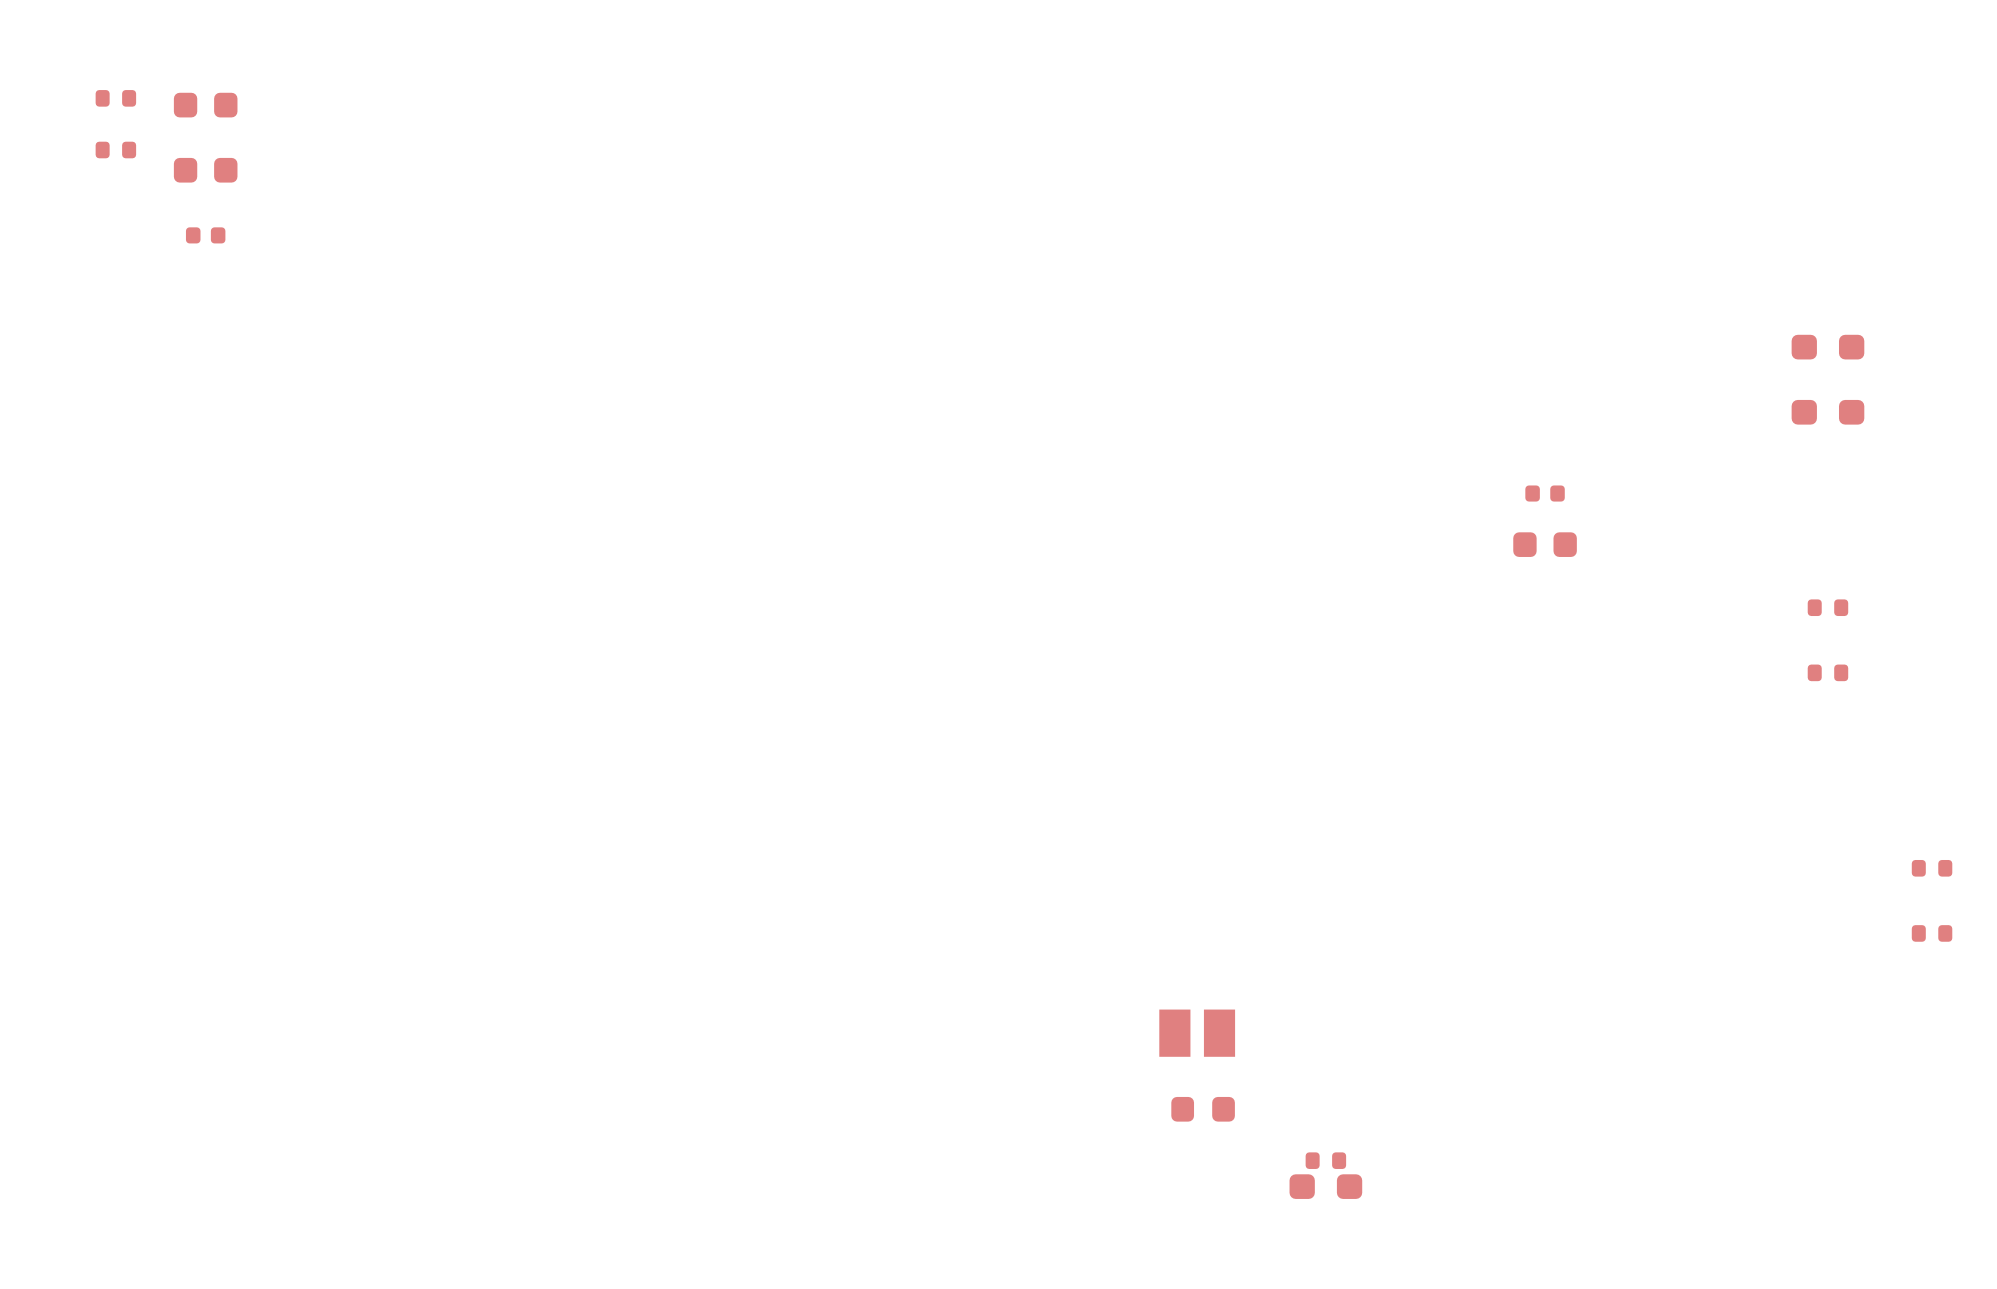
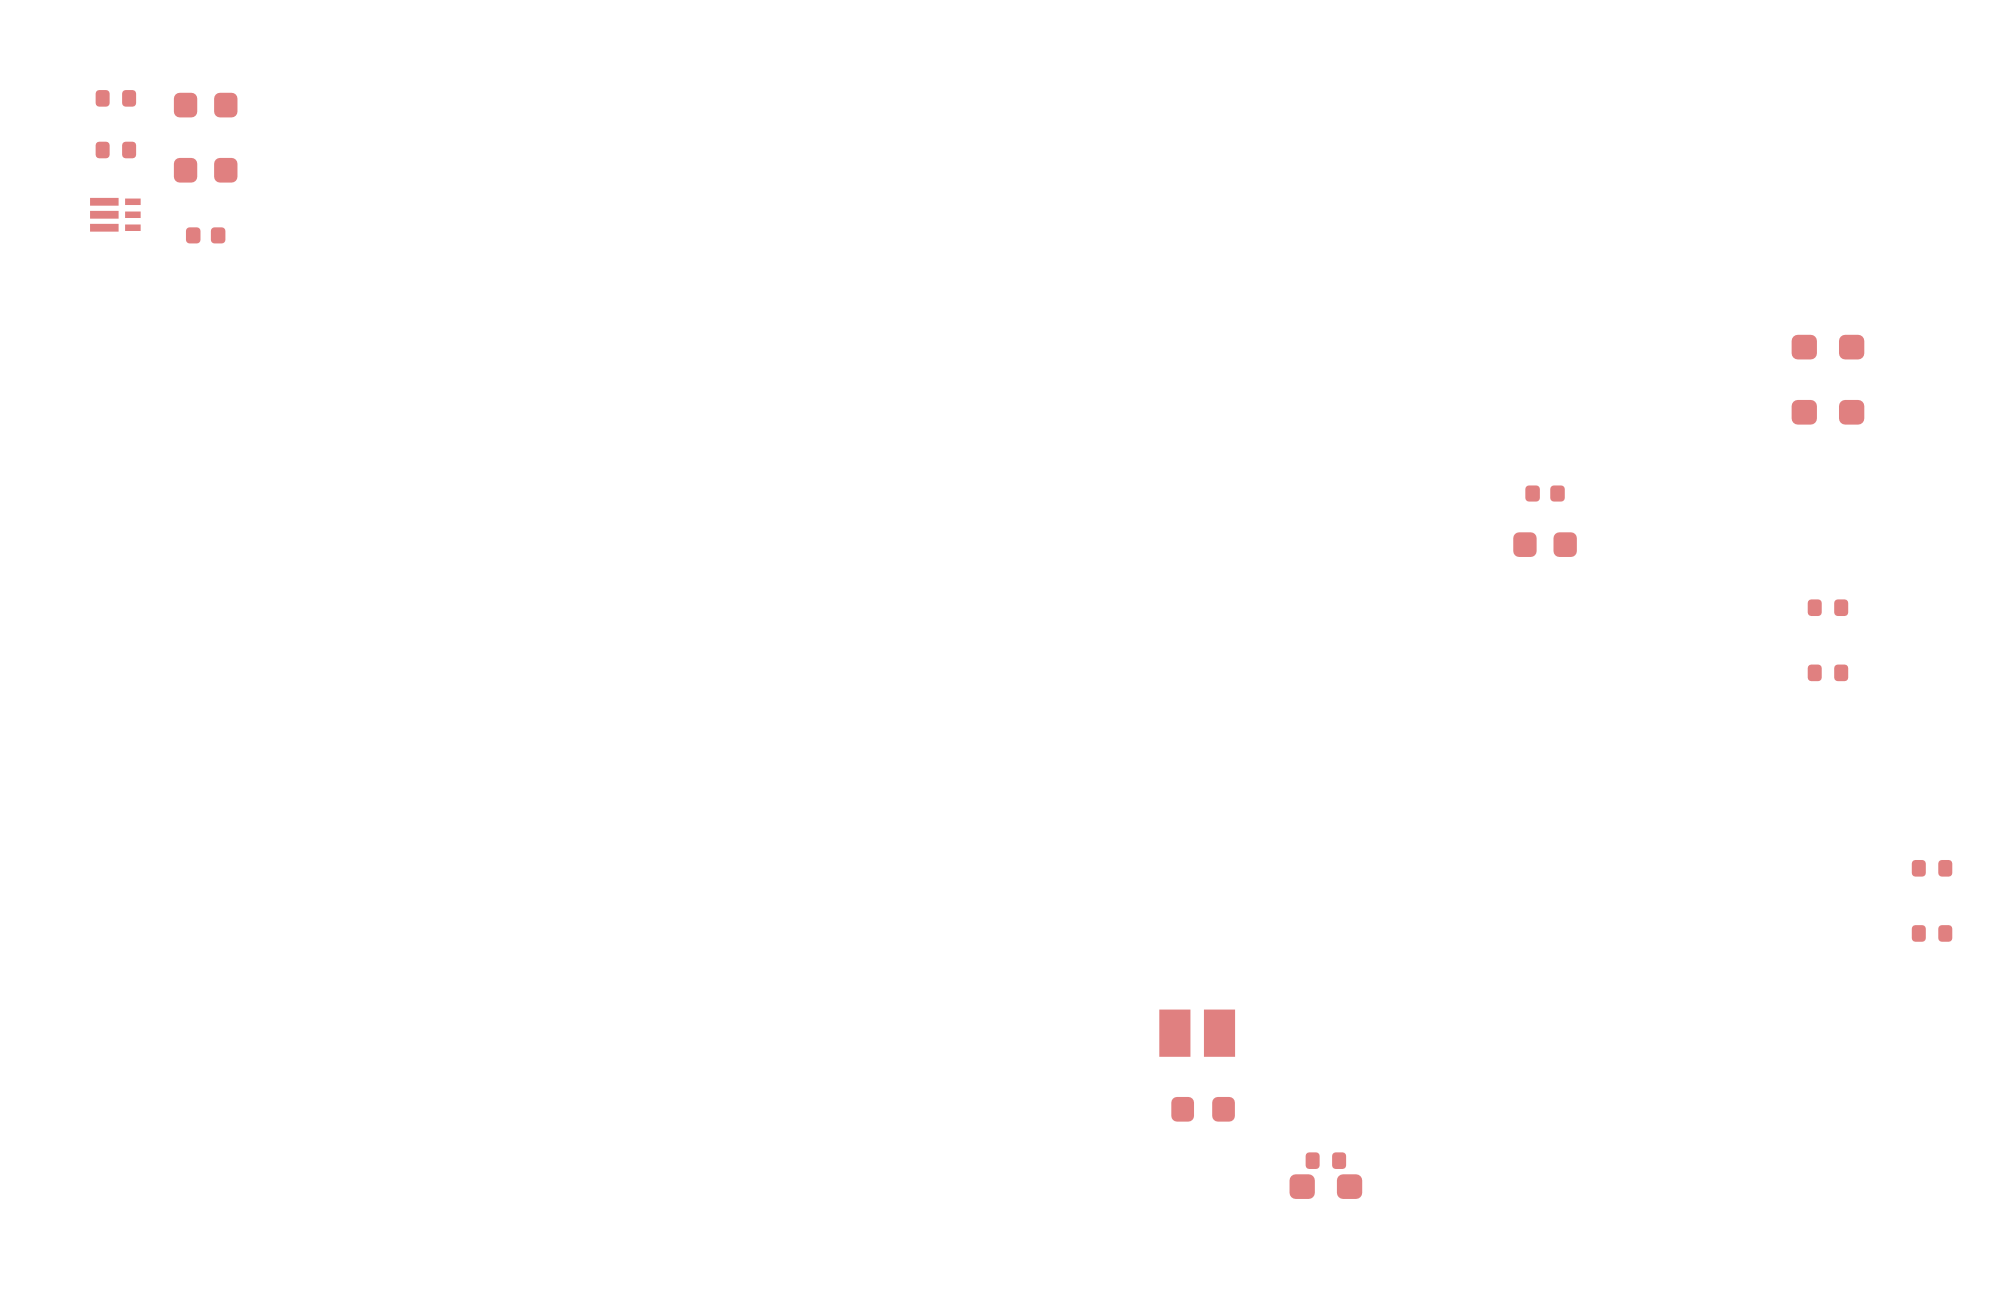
part: none -> (115, 214)

